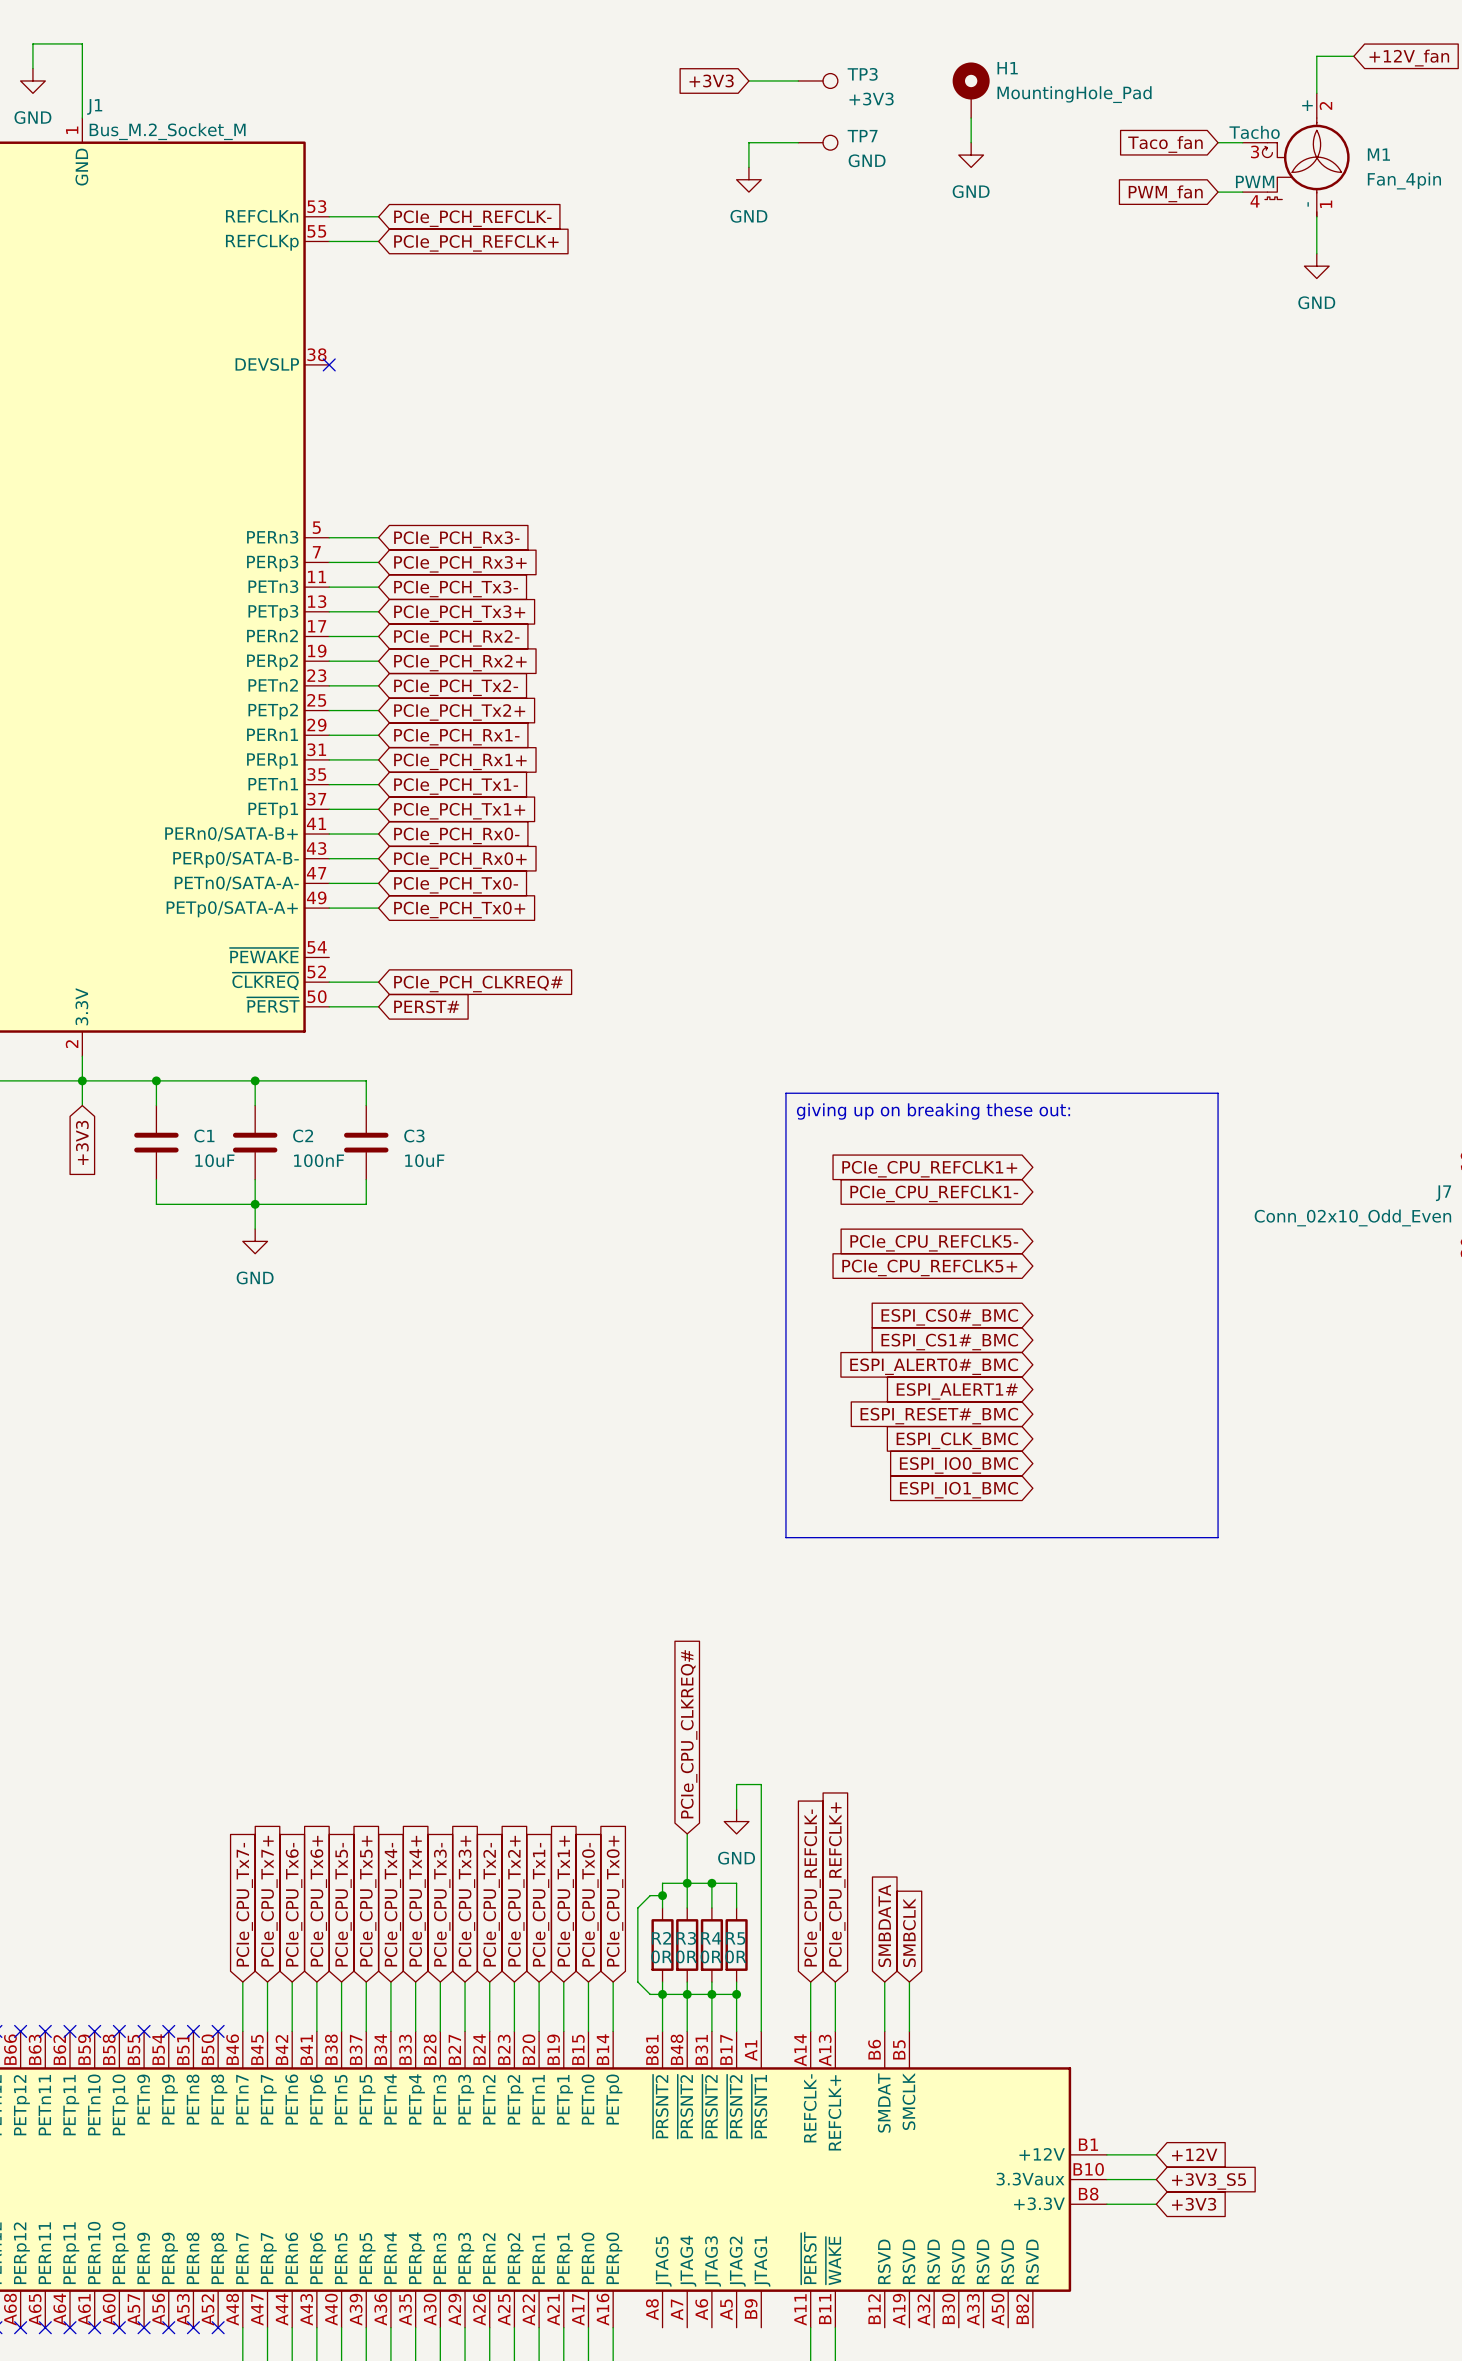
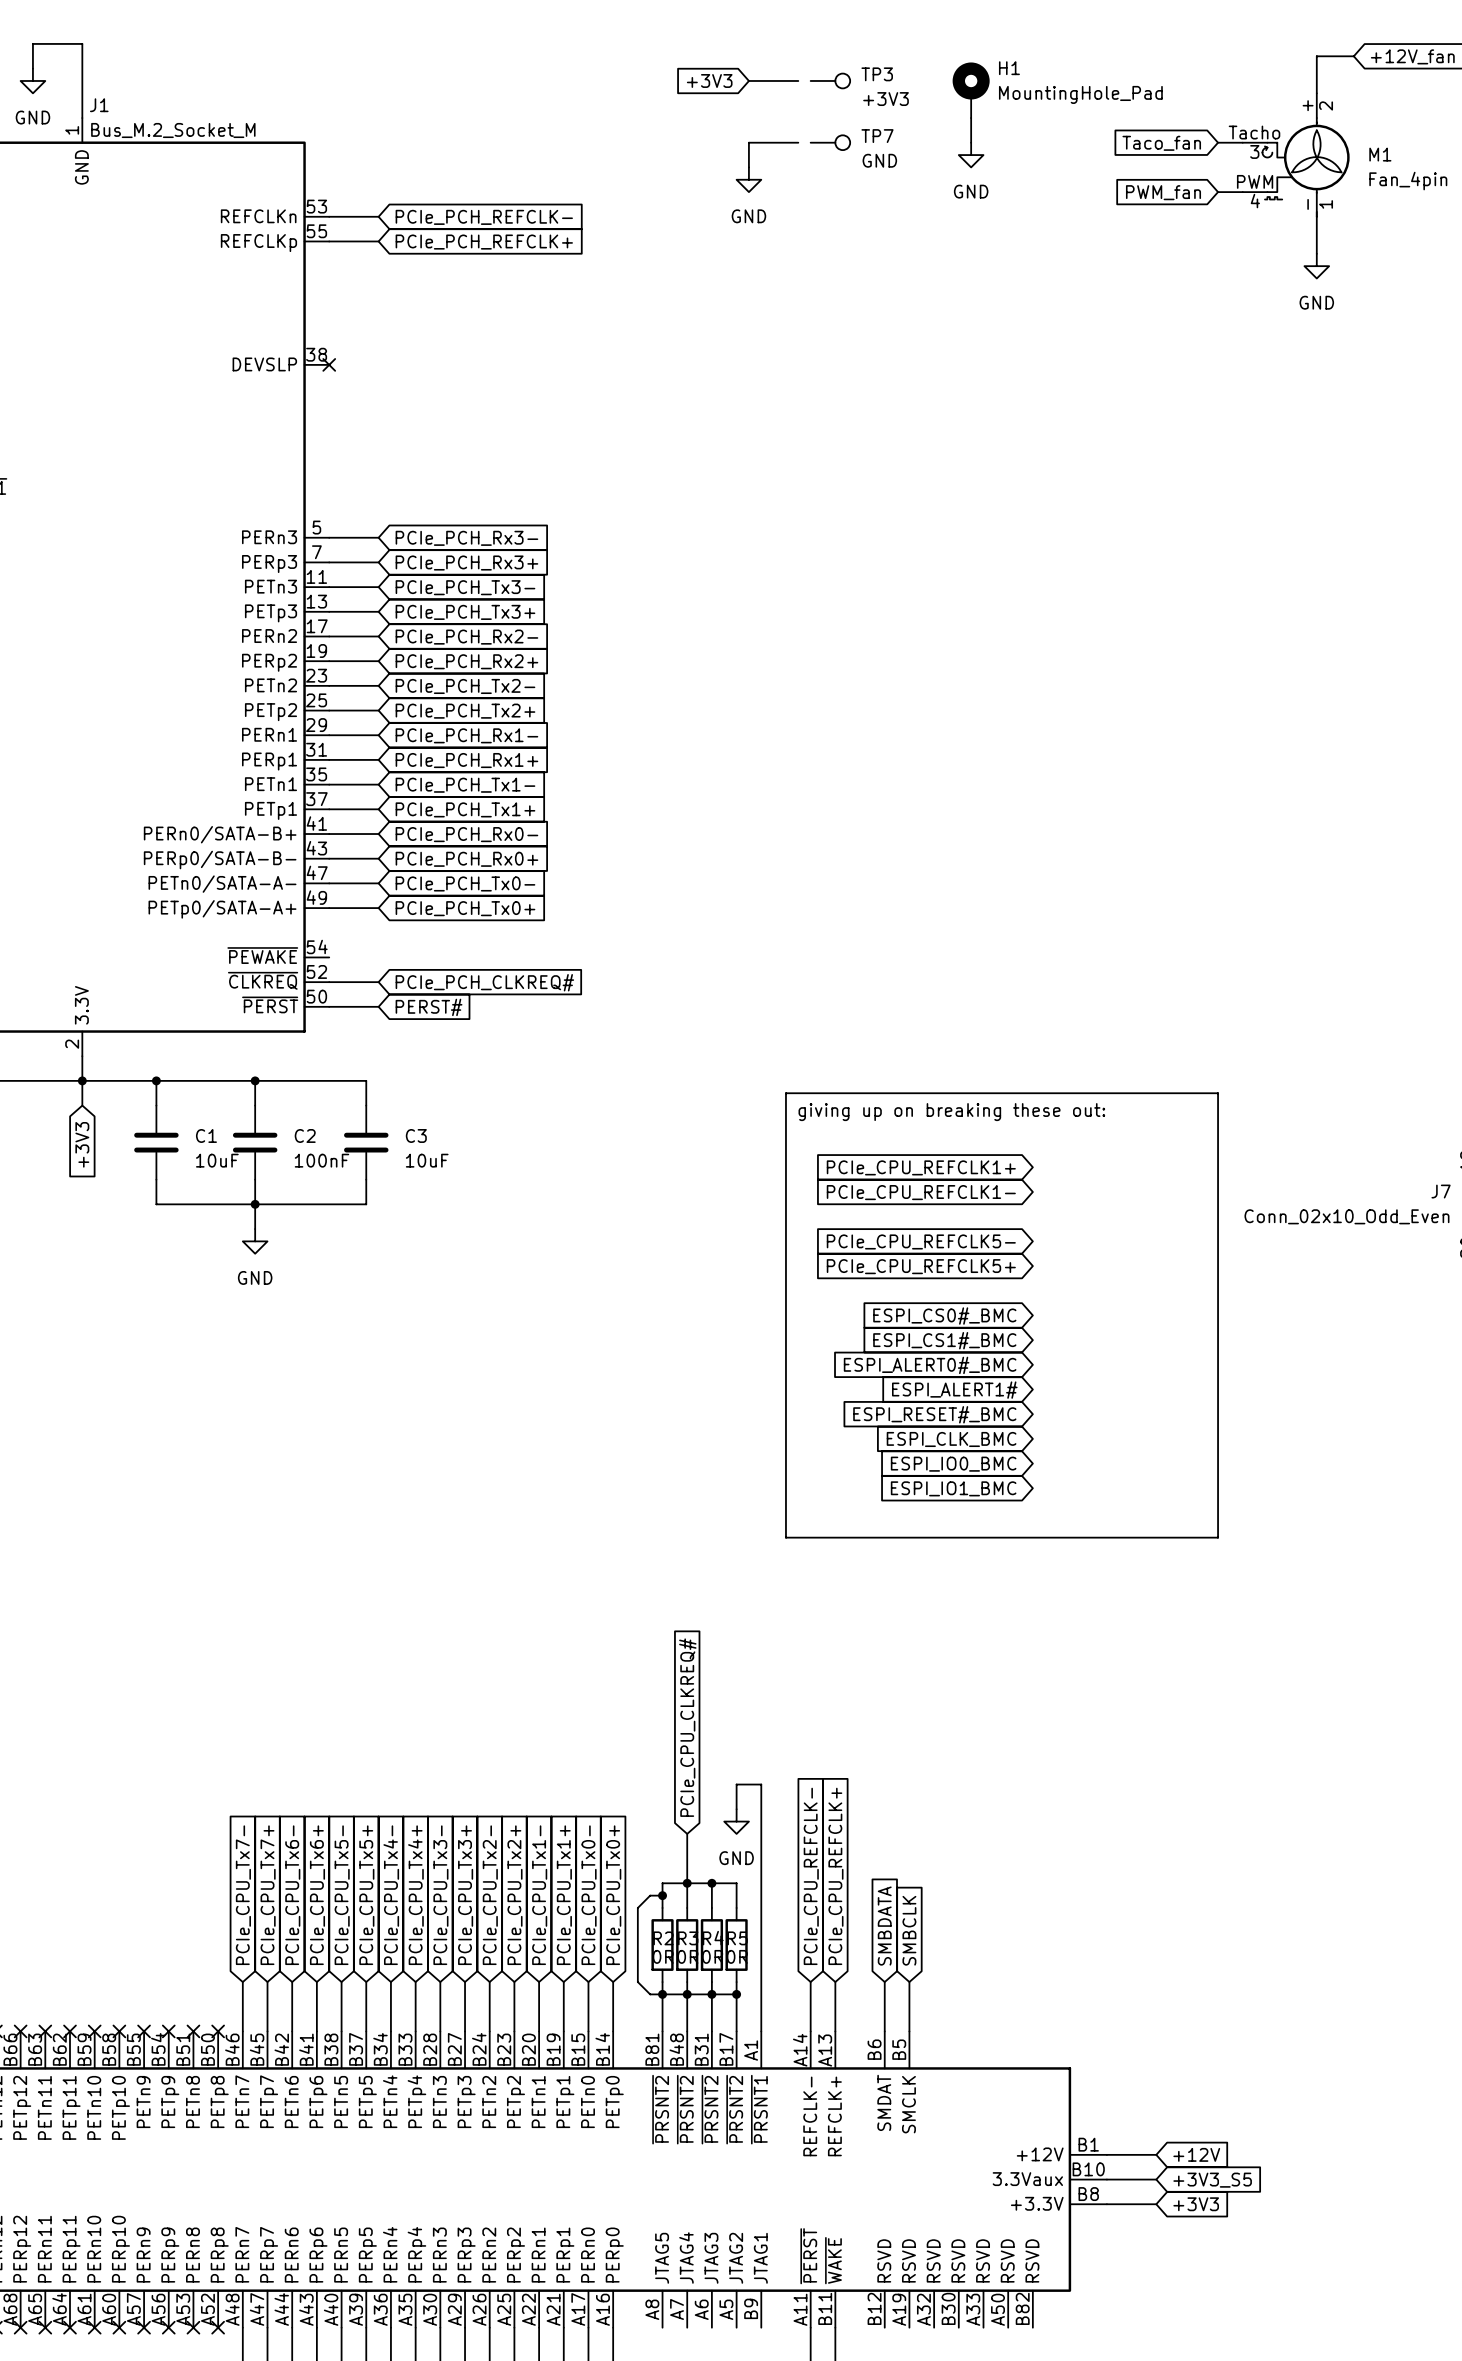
TP3 position: (818, 80) -> (830, 80)
TP7 position: (818, 142) -> (830, 142)

